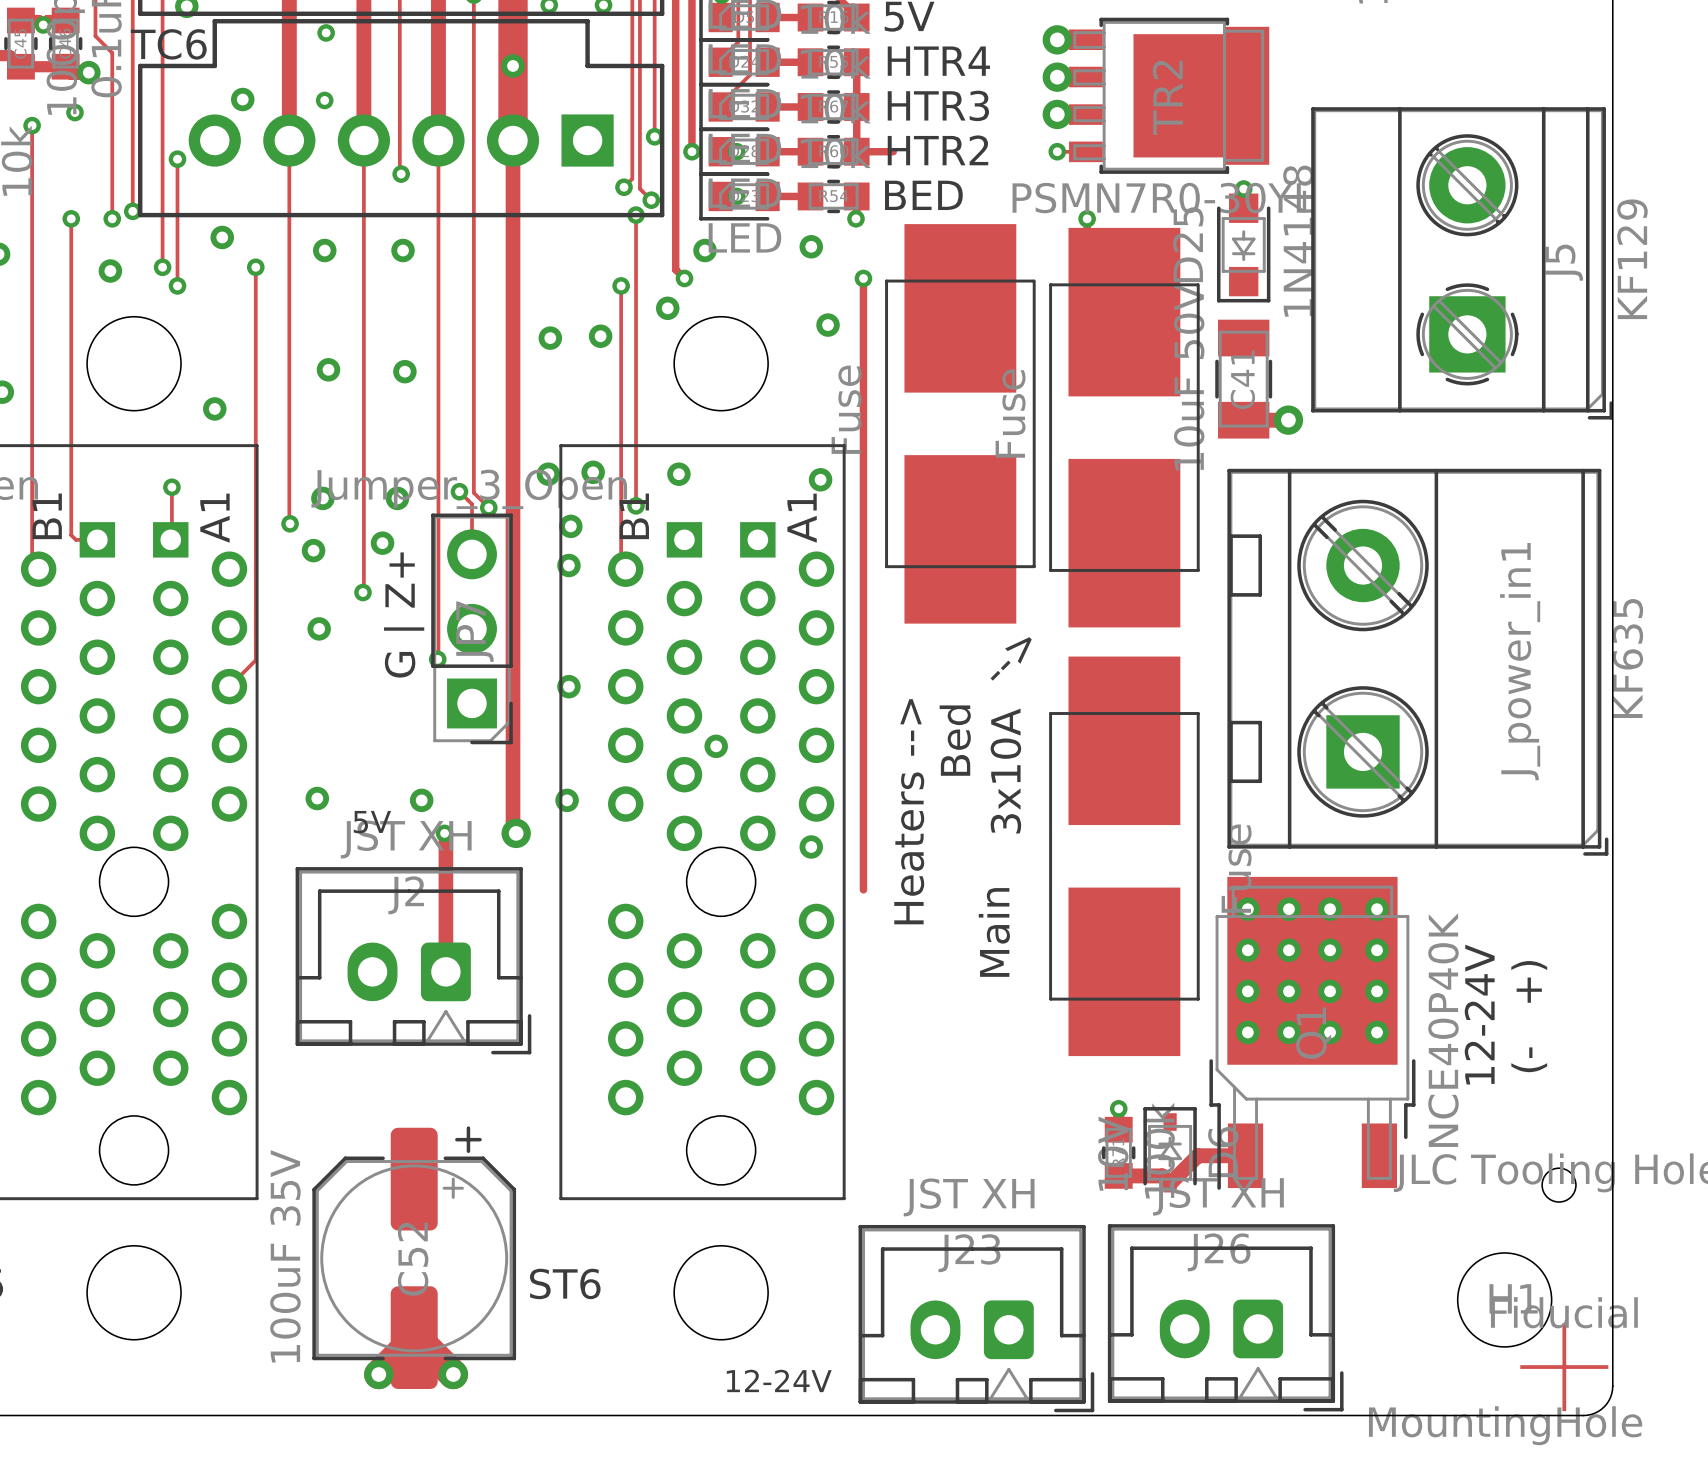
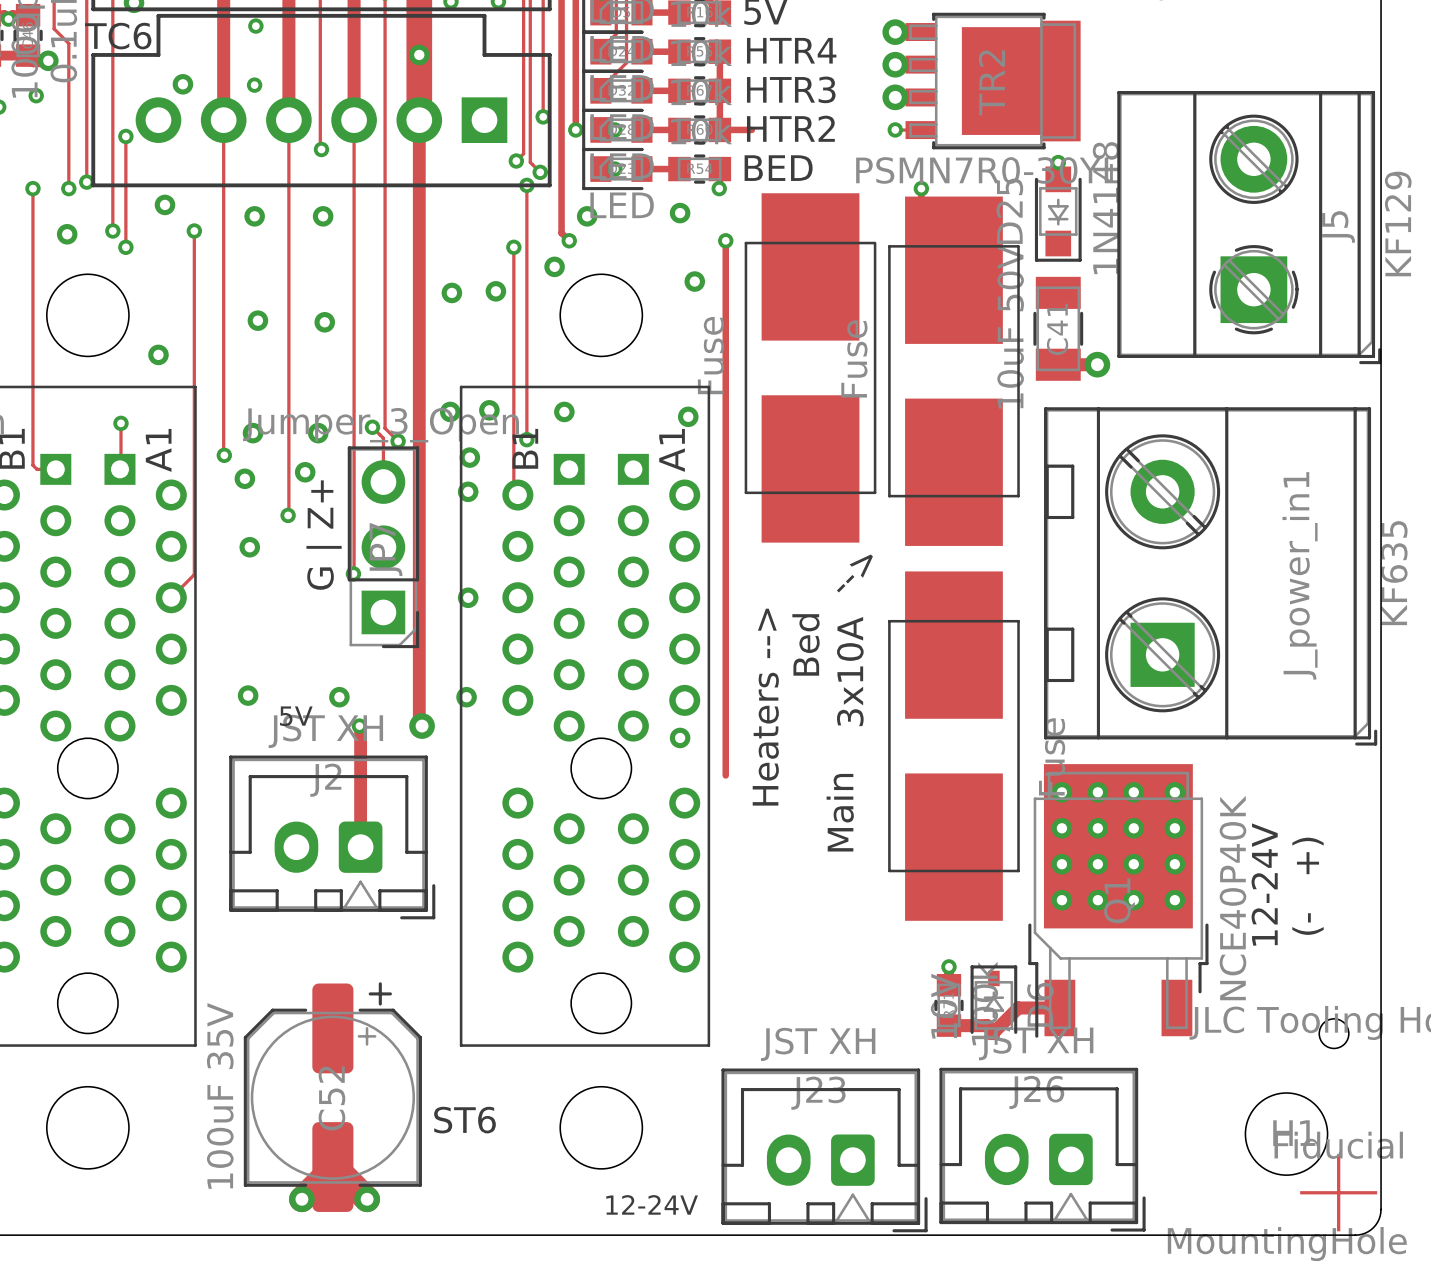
via: (716, 746) -> none

